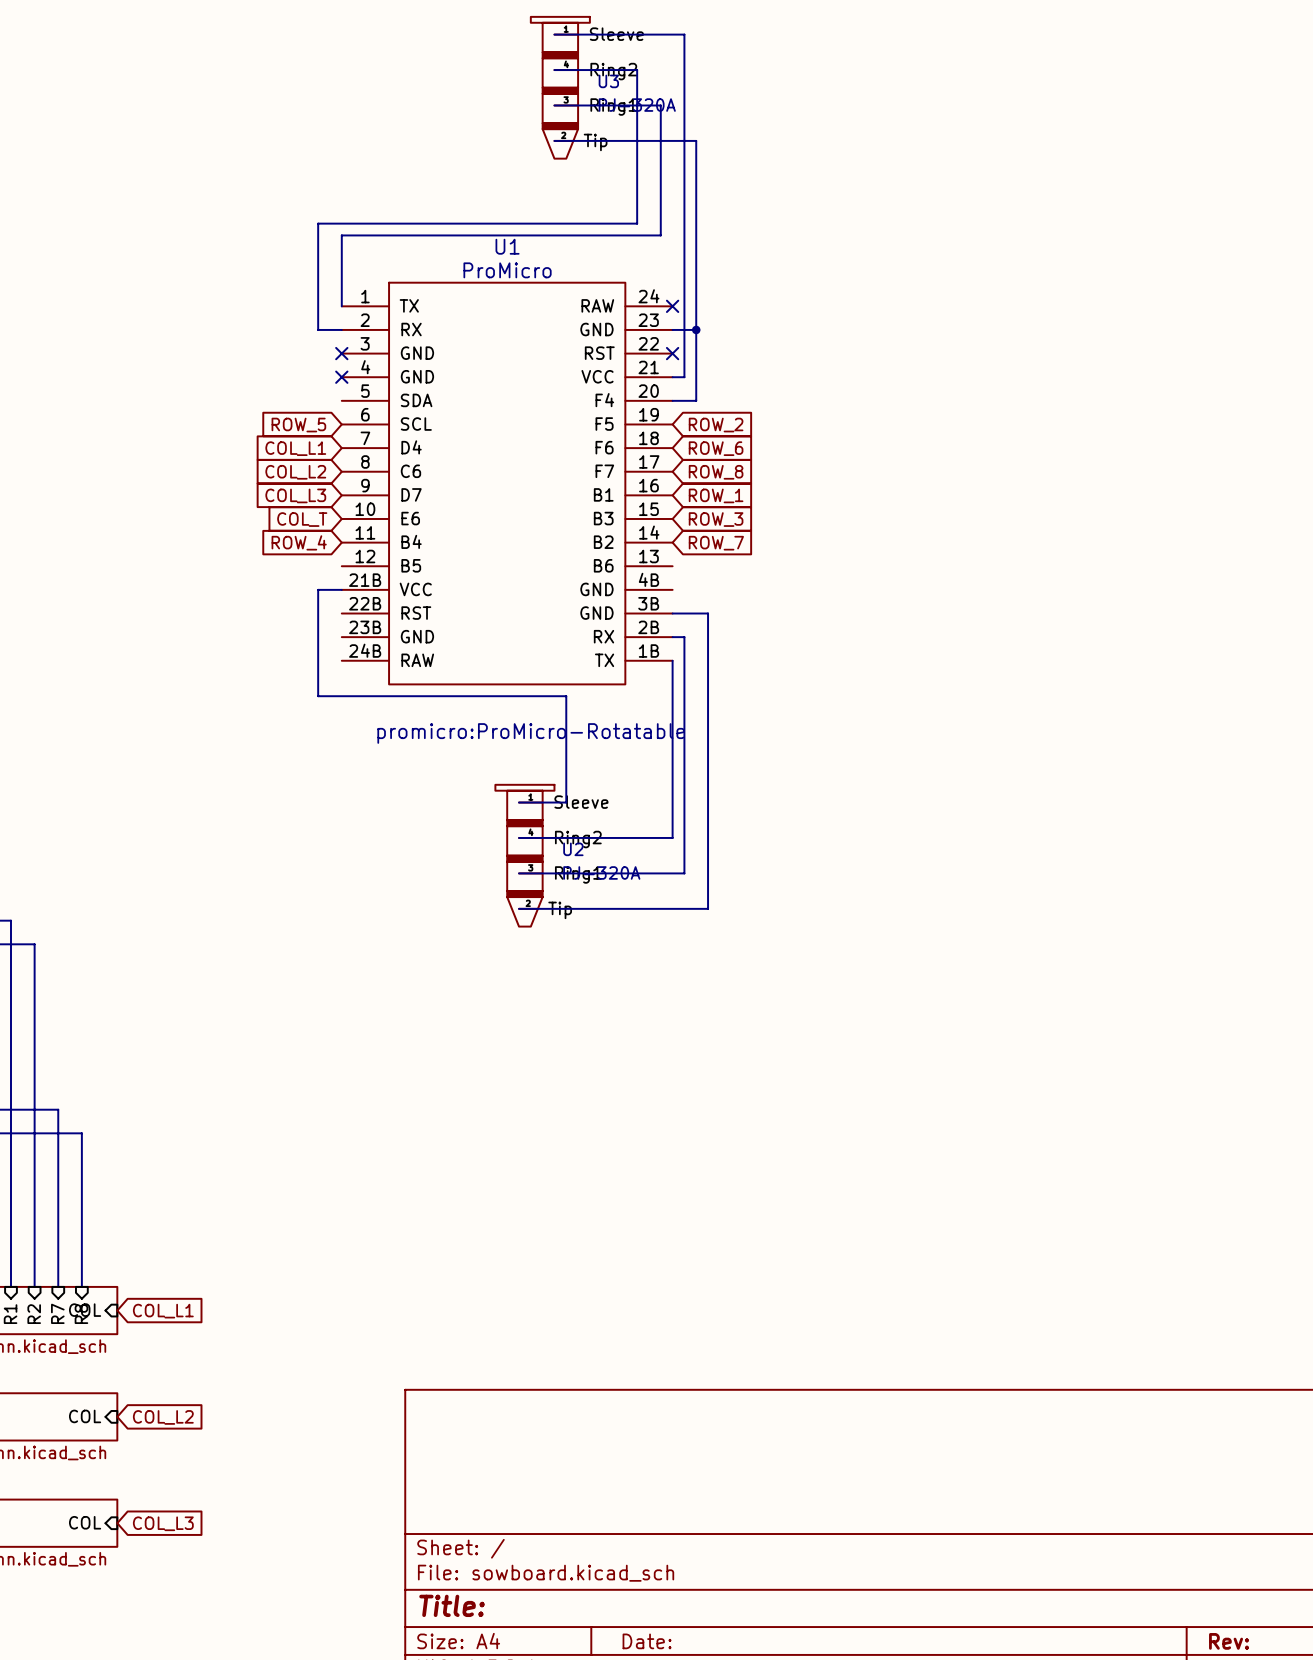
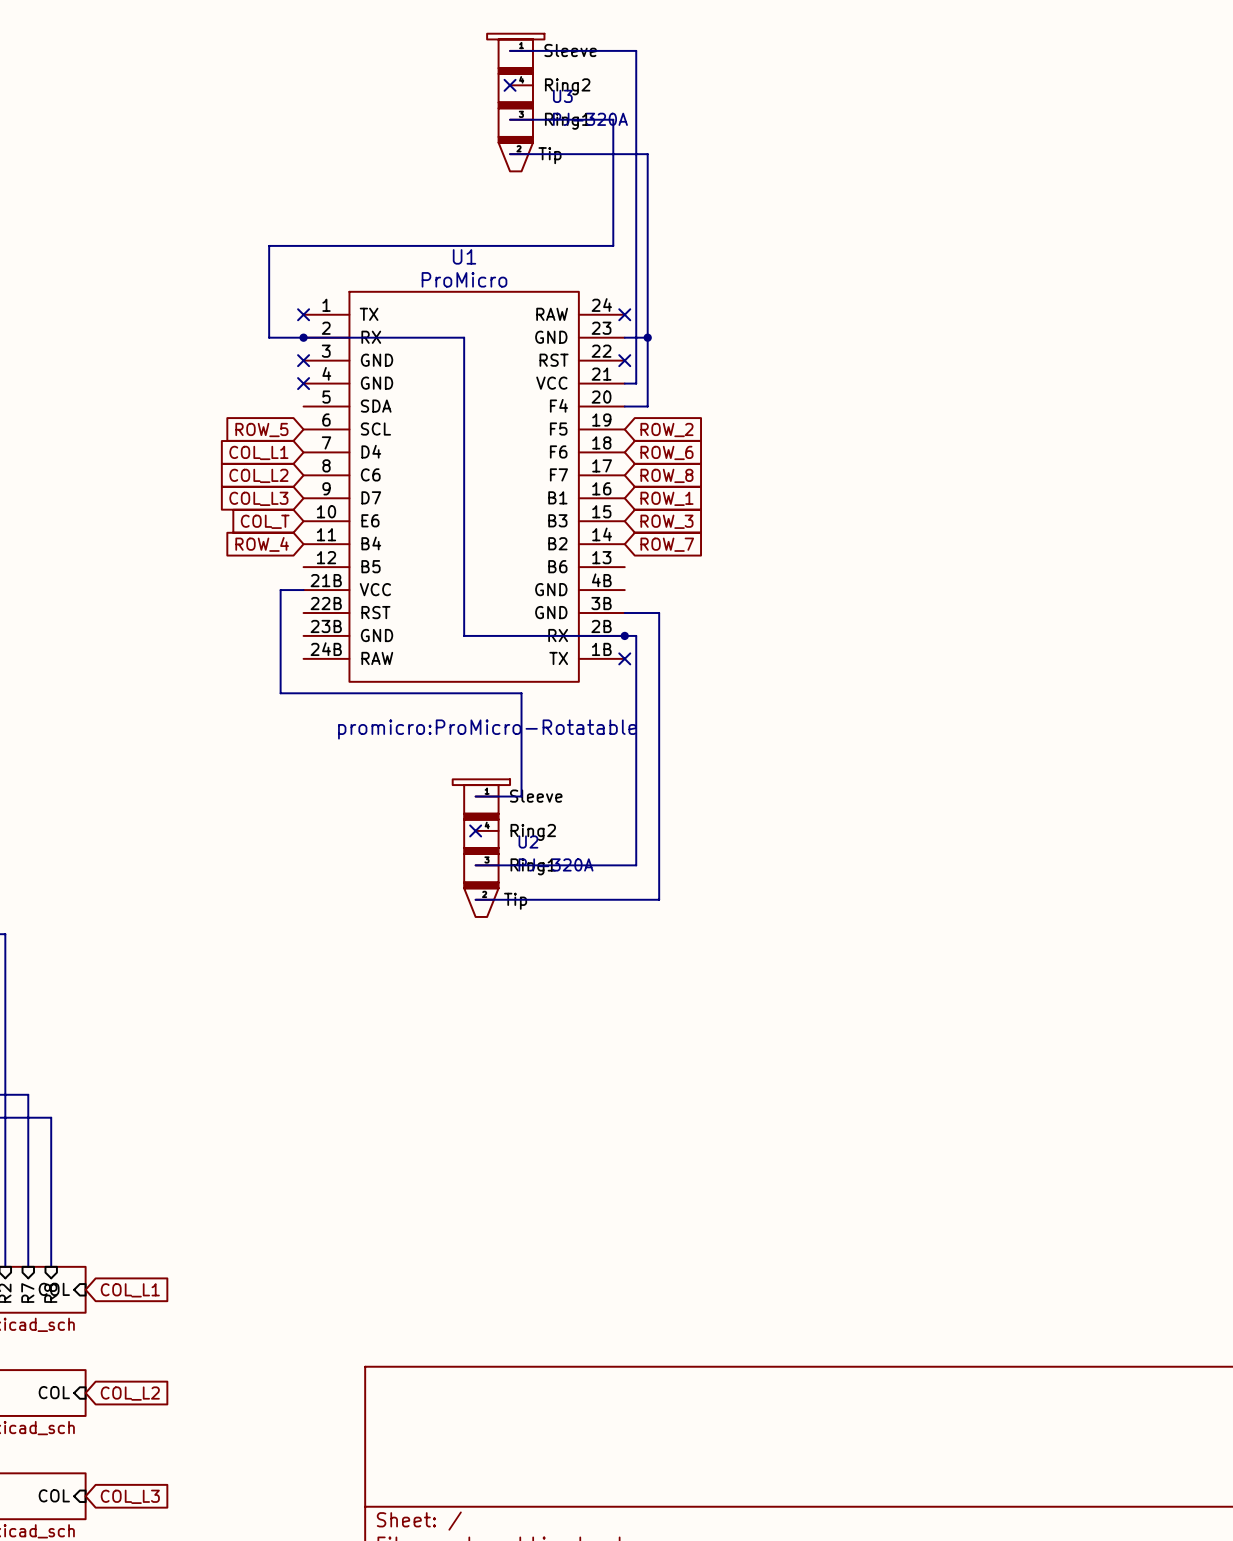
wire: (554, 70) (637, 70) (637, 223) (318, 223) (318, 329) -> none
no-connect mark: none -> (510, 85)
wire: (341, 235) (341, 306) -> (303, 245) (269, 245) (269, 337) (280, 337)
no-connect mark: none -> (303, 314)
wire: none -> (303, 337) (464, 337) (464, 635) (624, 635)
junction: none -> (303, 337)
junction: none -> (624, 635)
wire: (672, 660) (672, 837) (519, 837) -> none
no-connect mark: none -> (624, 658)
no-connect mark: none -> (475, 830)

